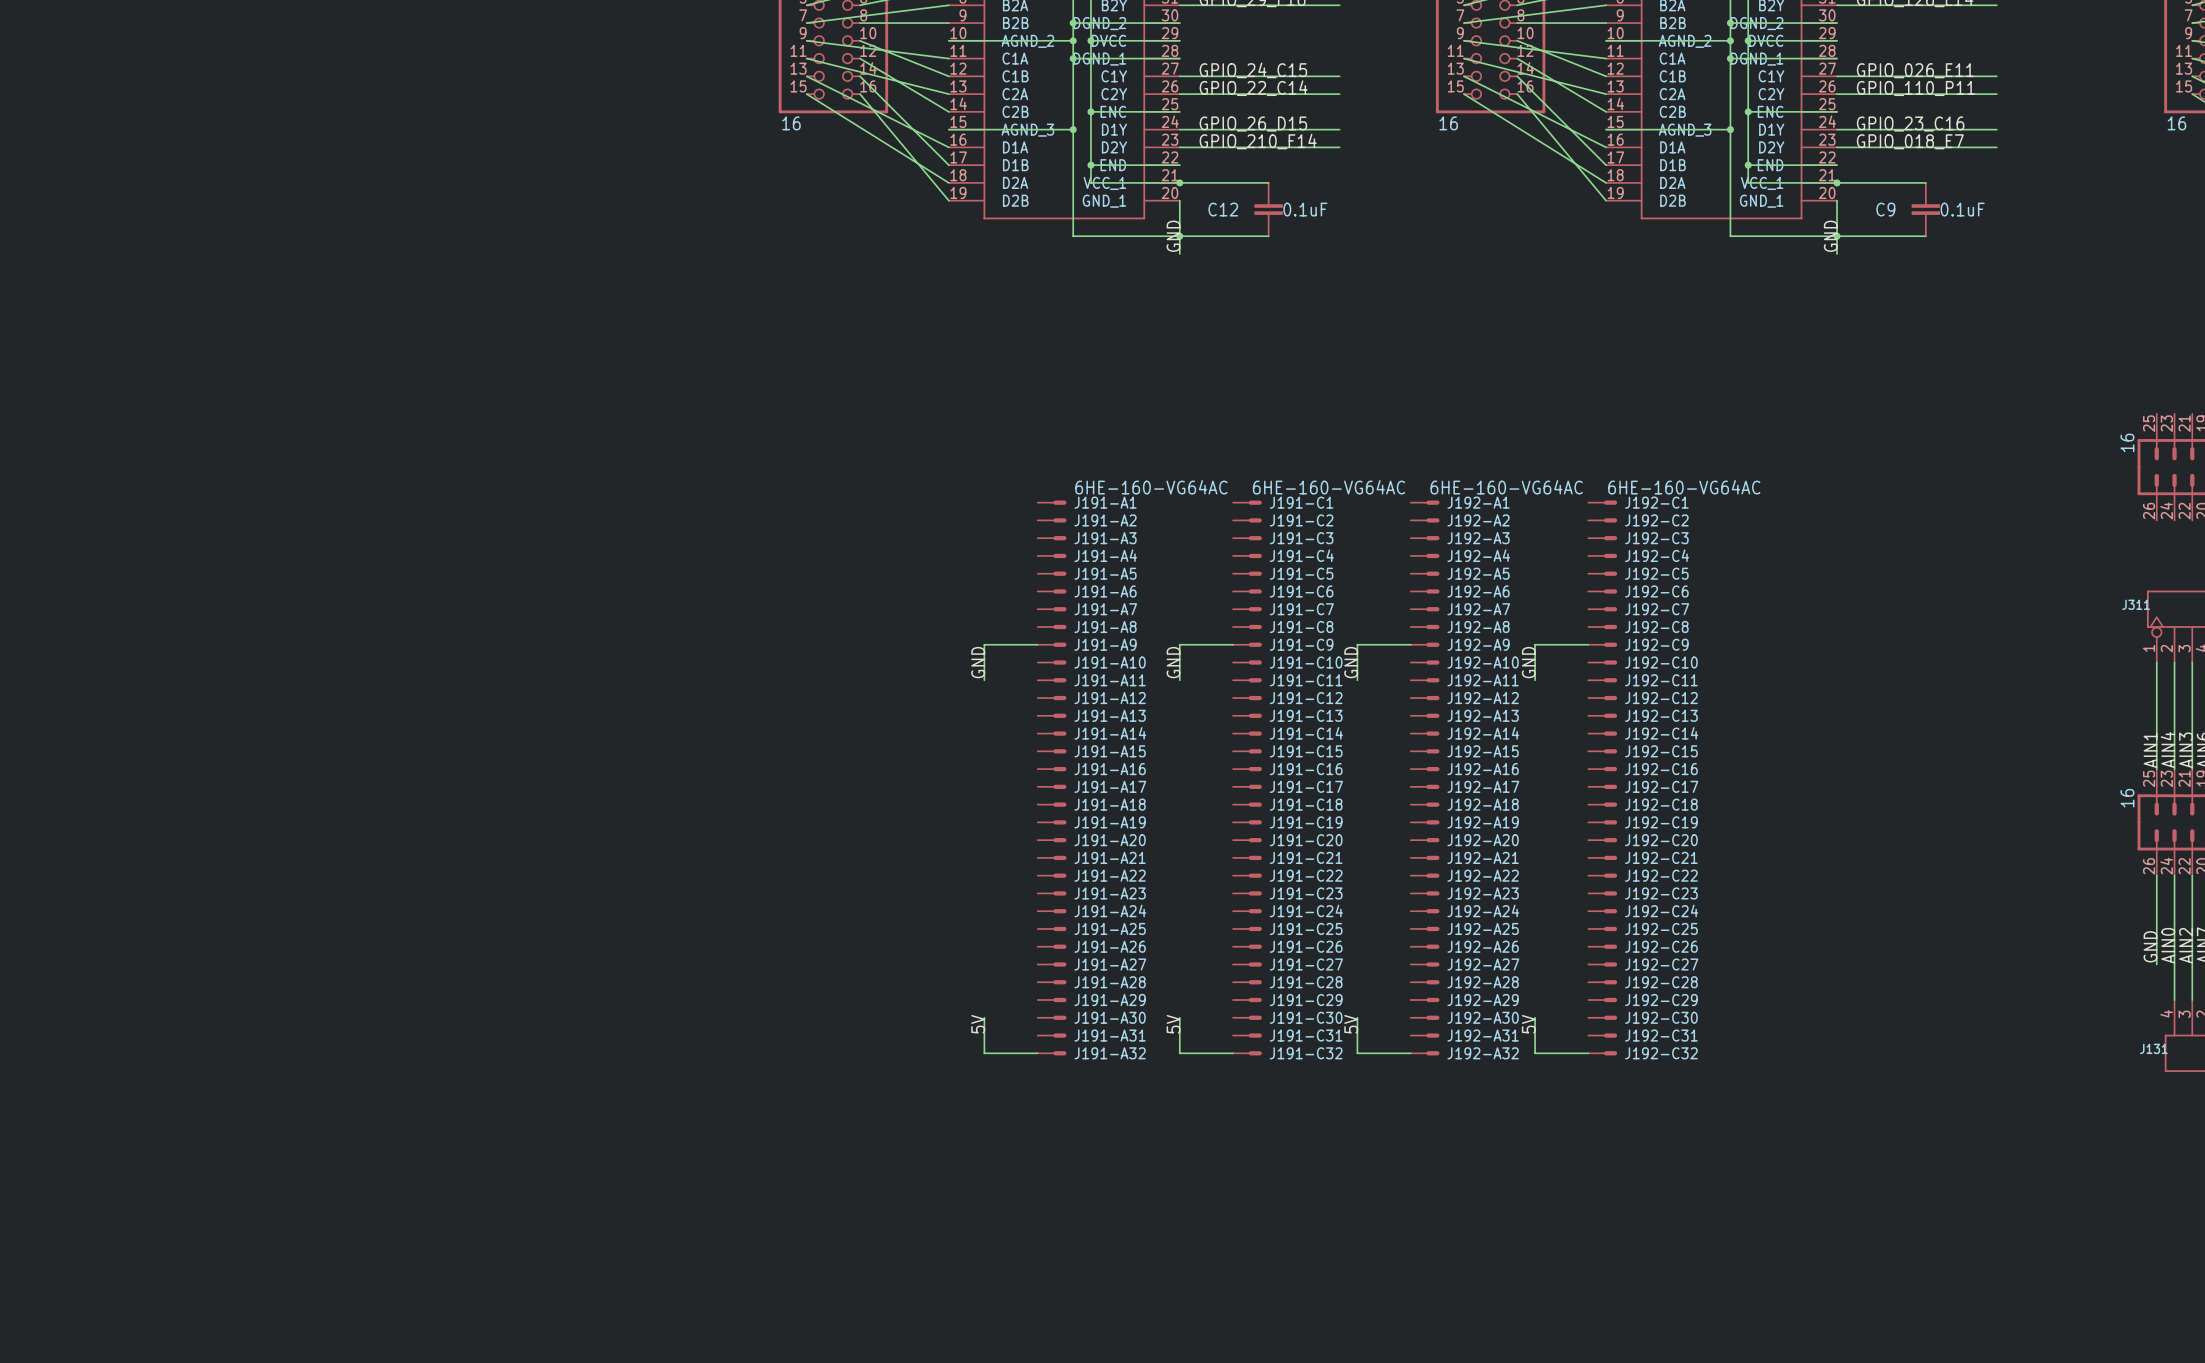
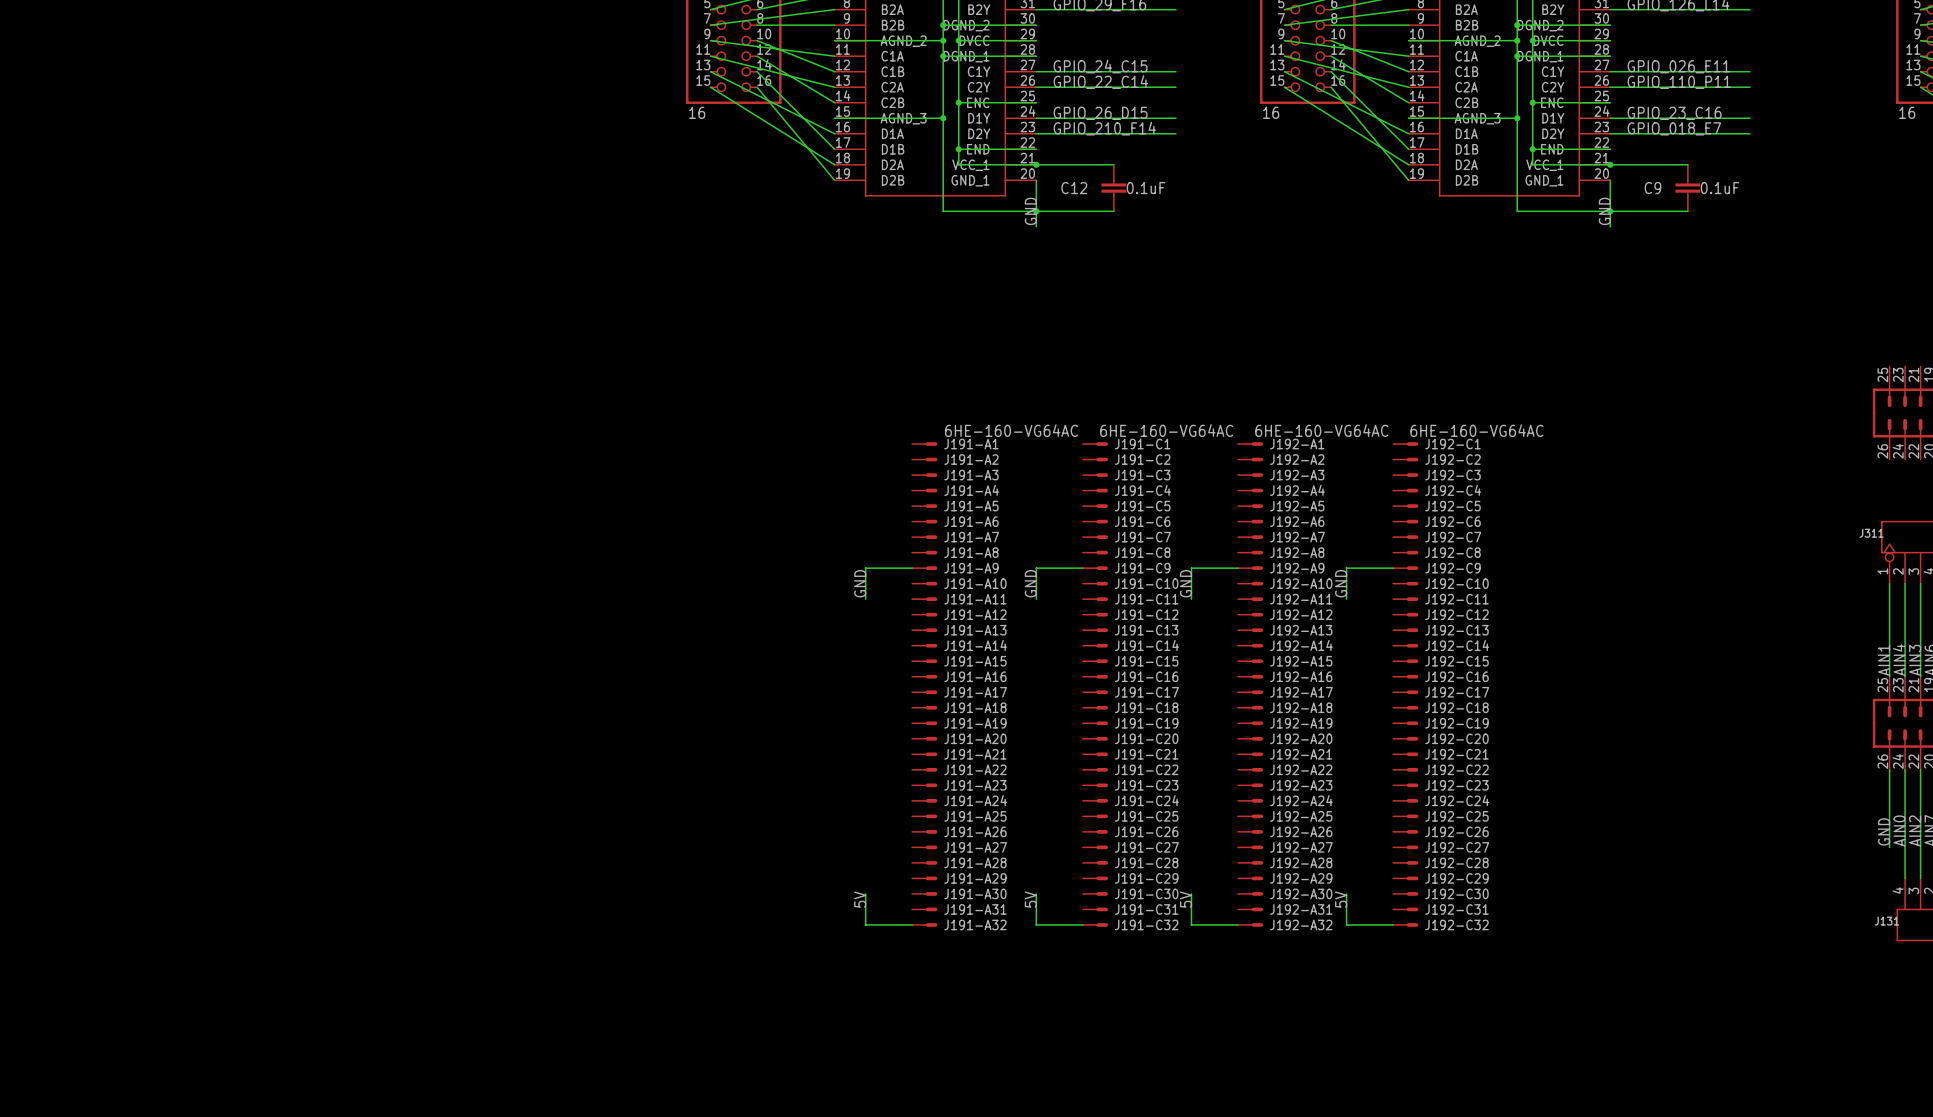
part value: 16 (2127, 442) -> none
part value: 16 (2127, 798) -> none

